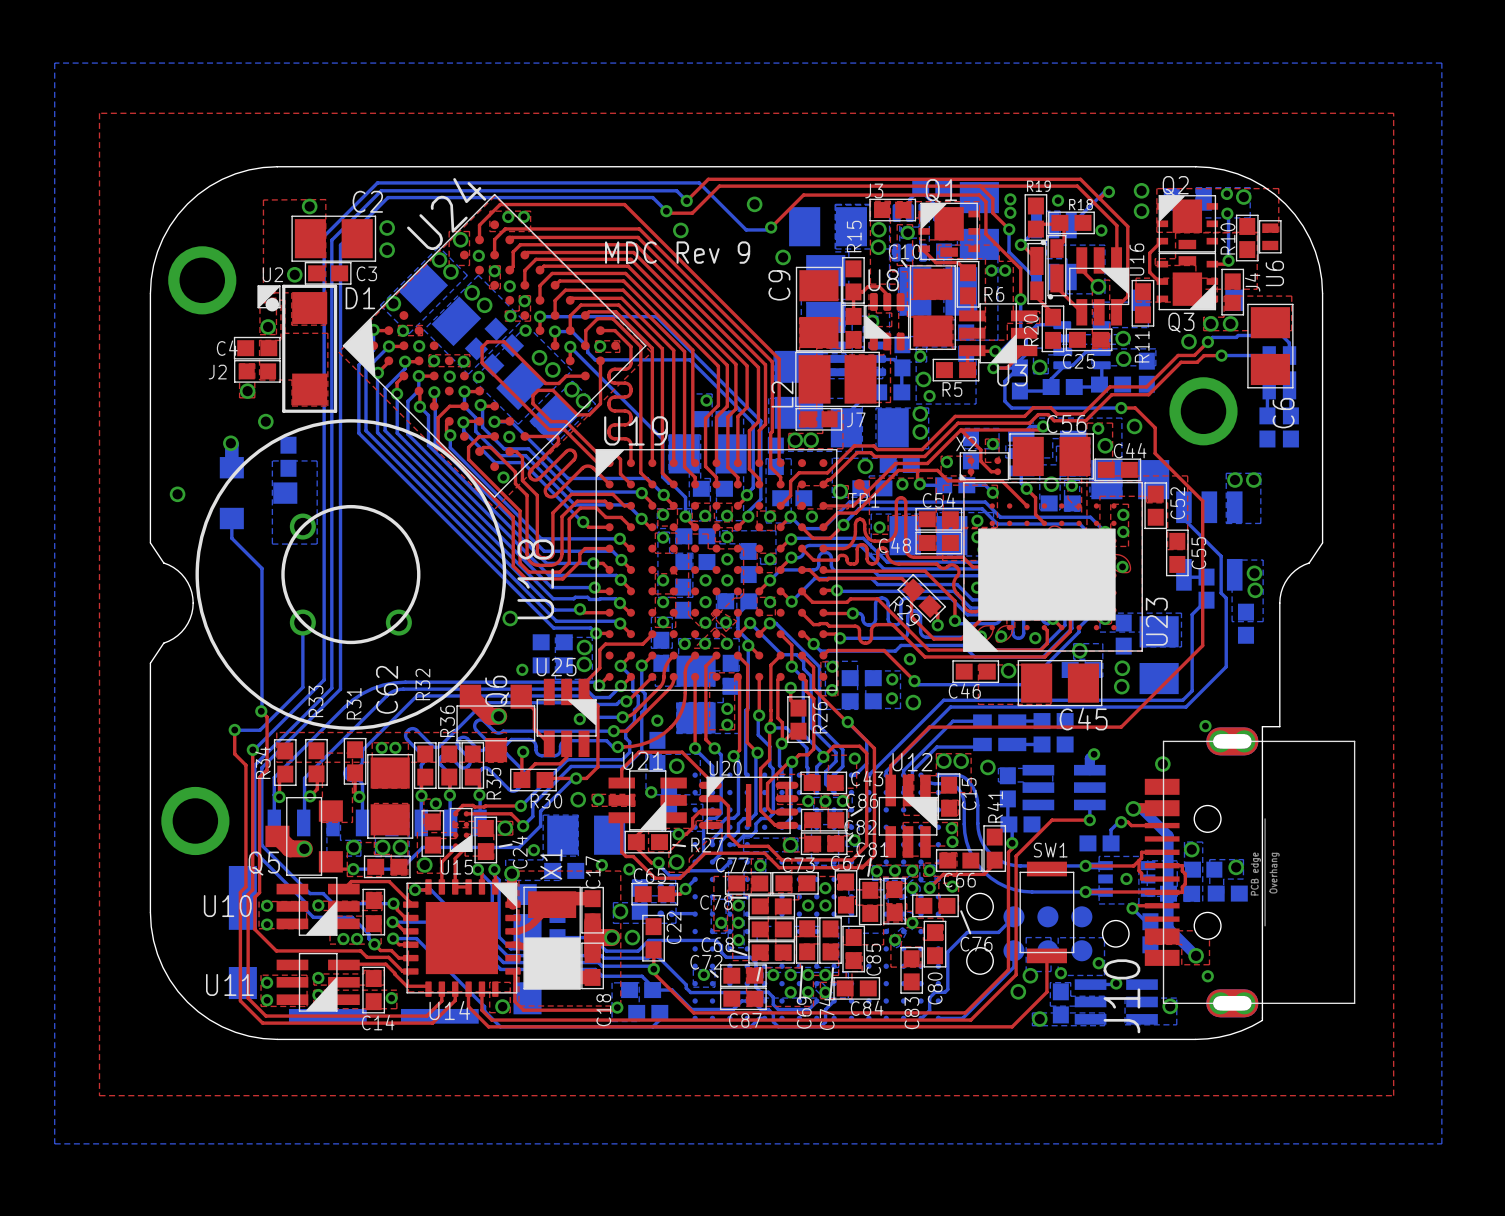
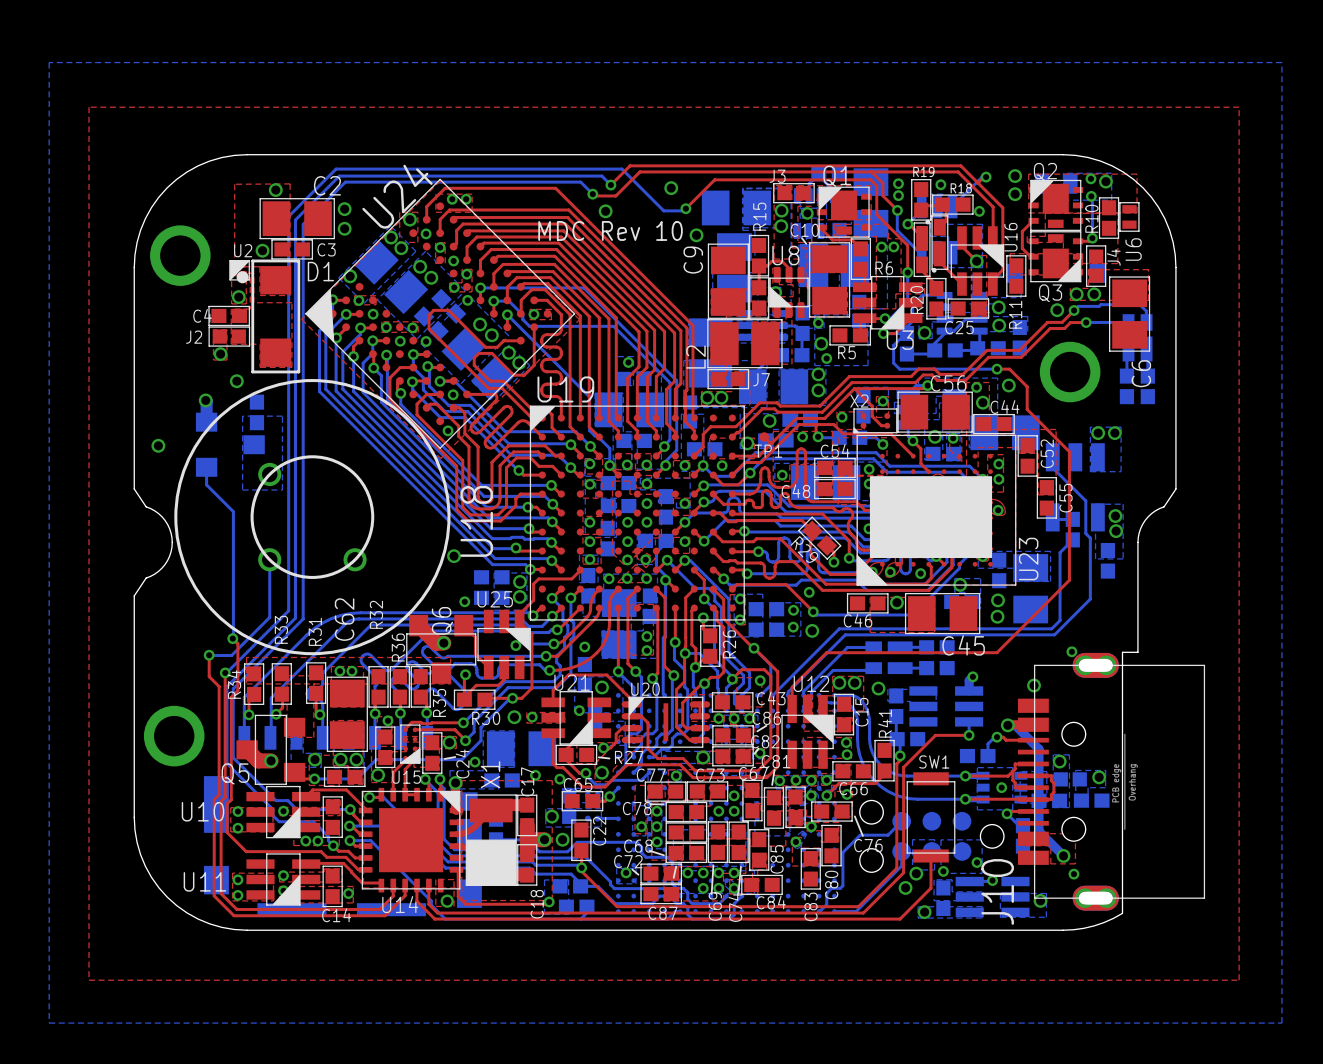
text: MDC Rev 9 (677, 252) -> MDC Rev 10 (610, 230)

